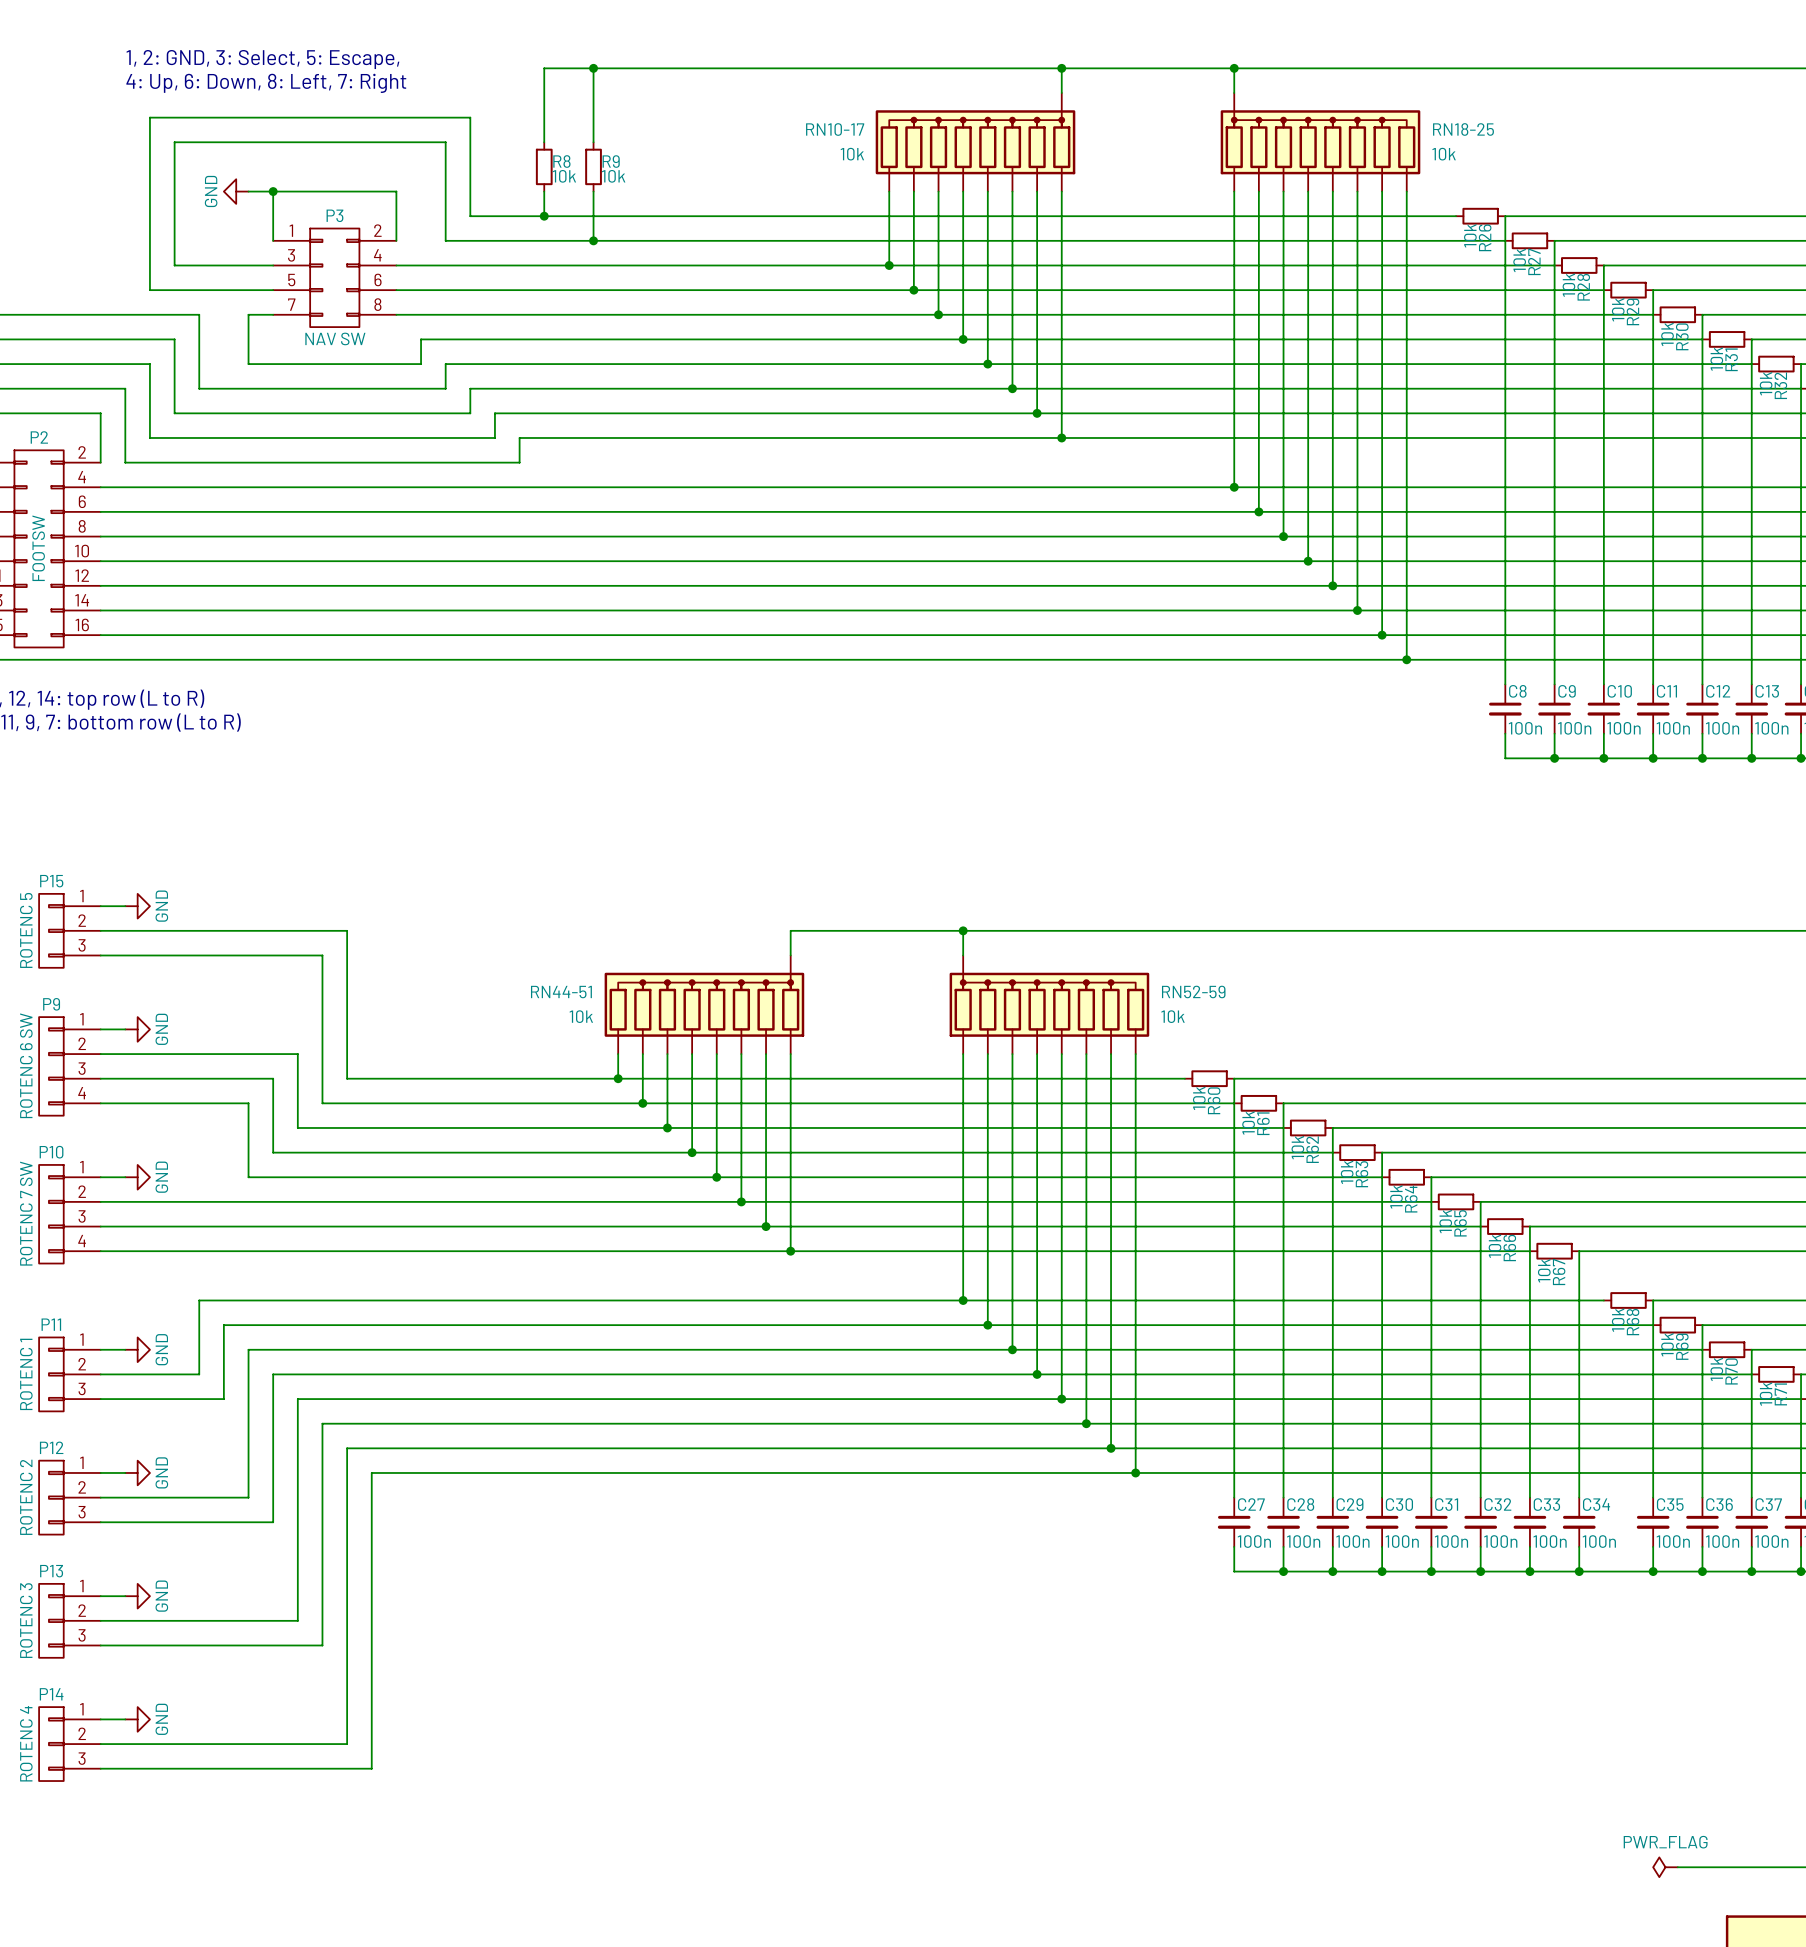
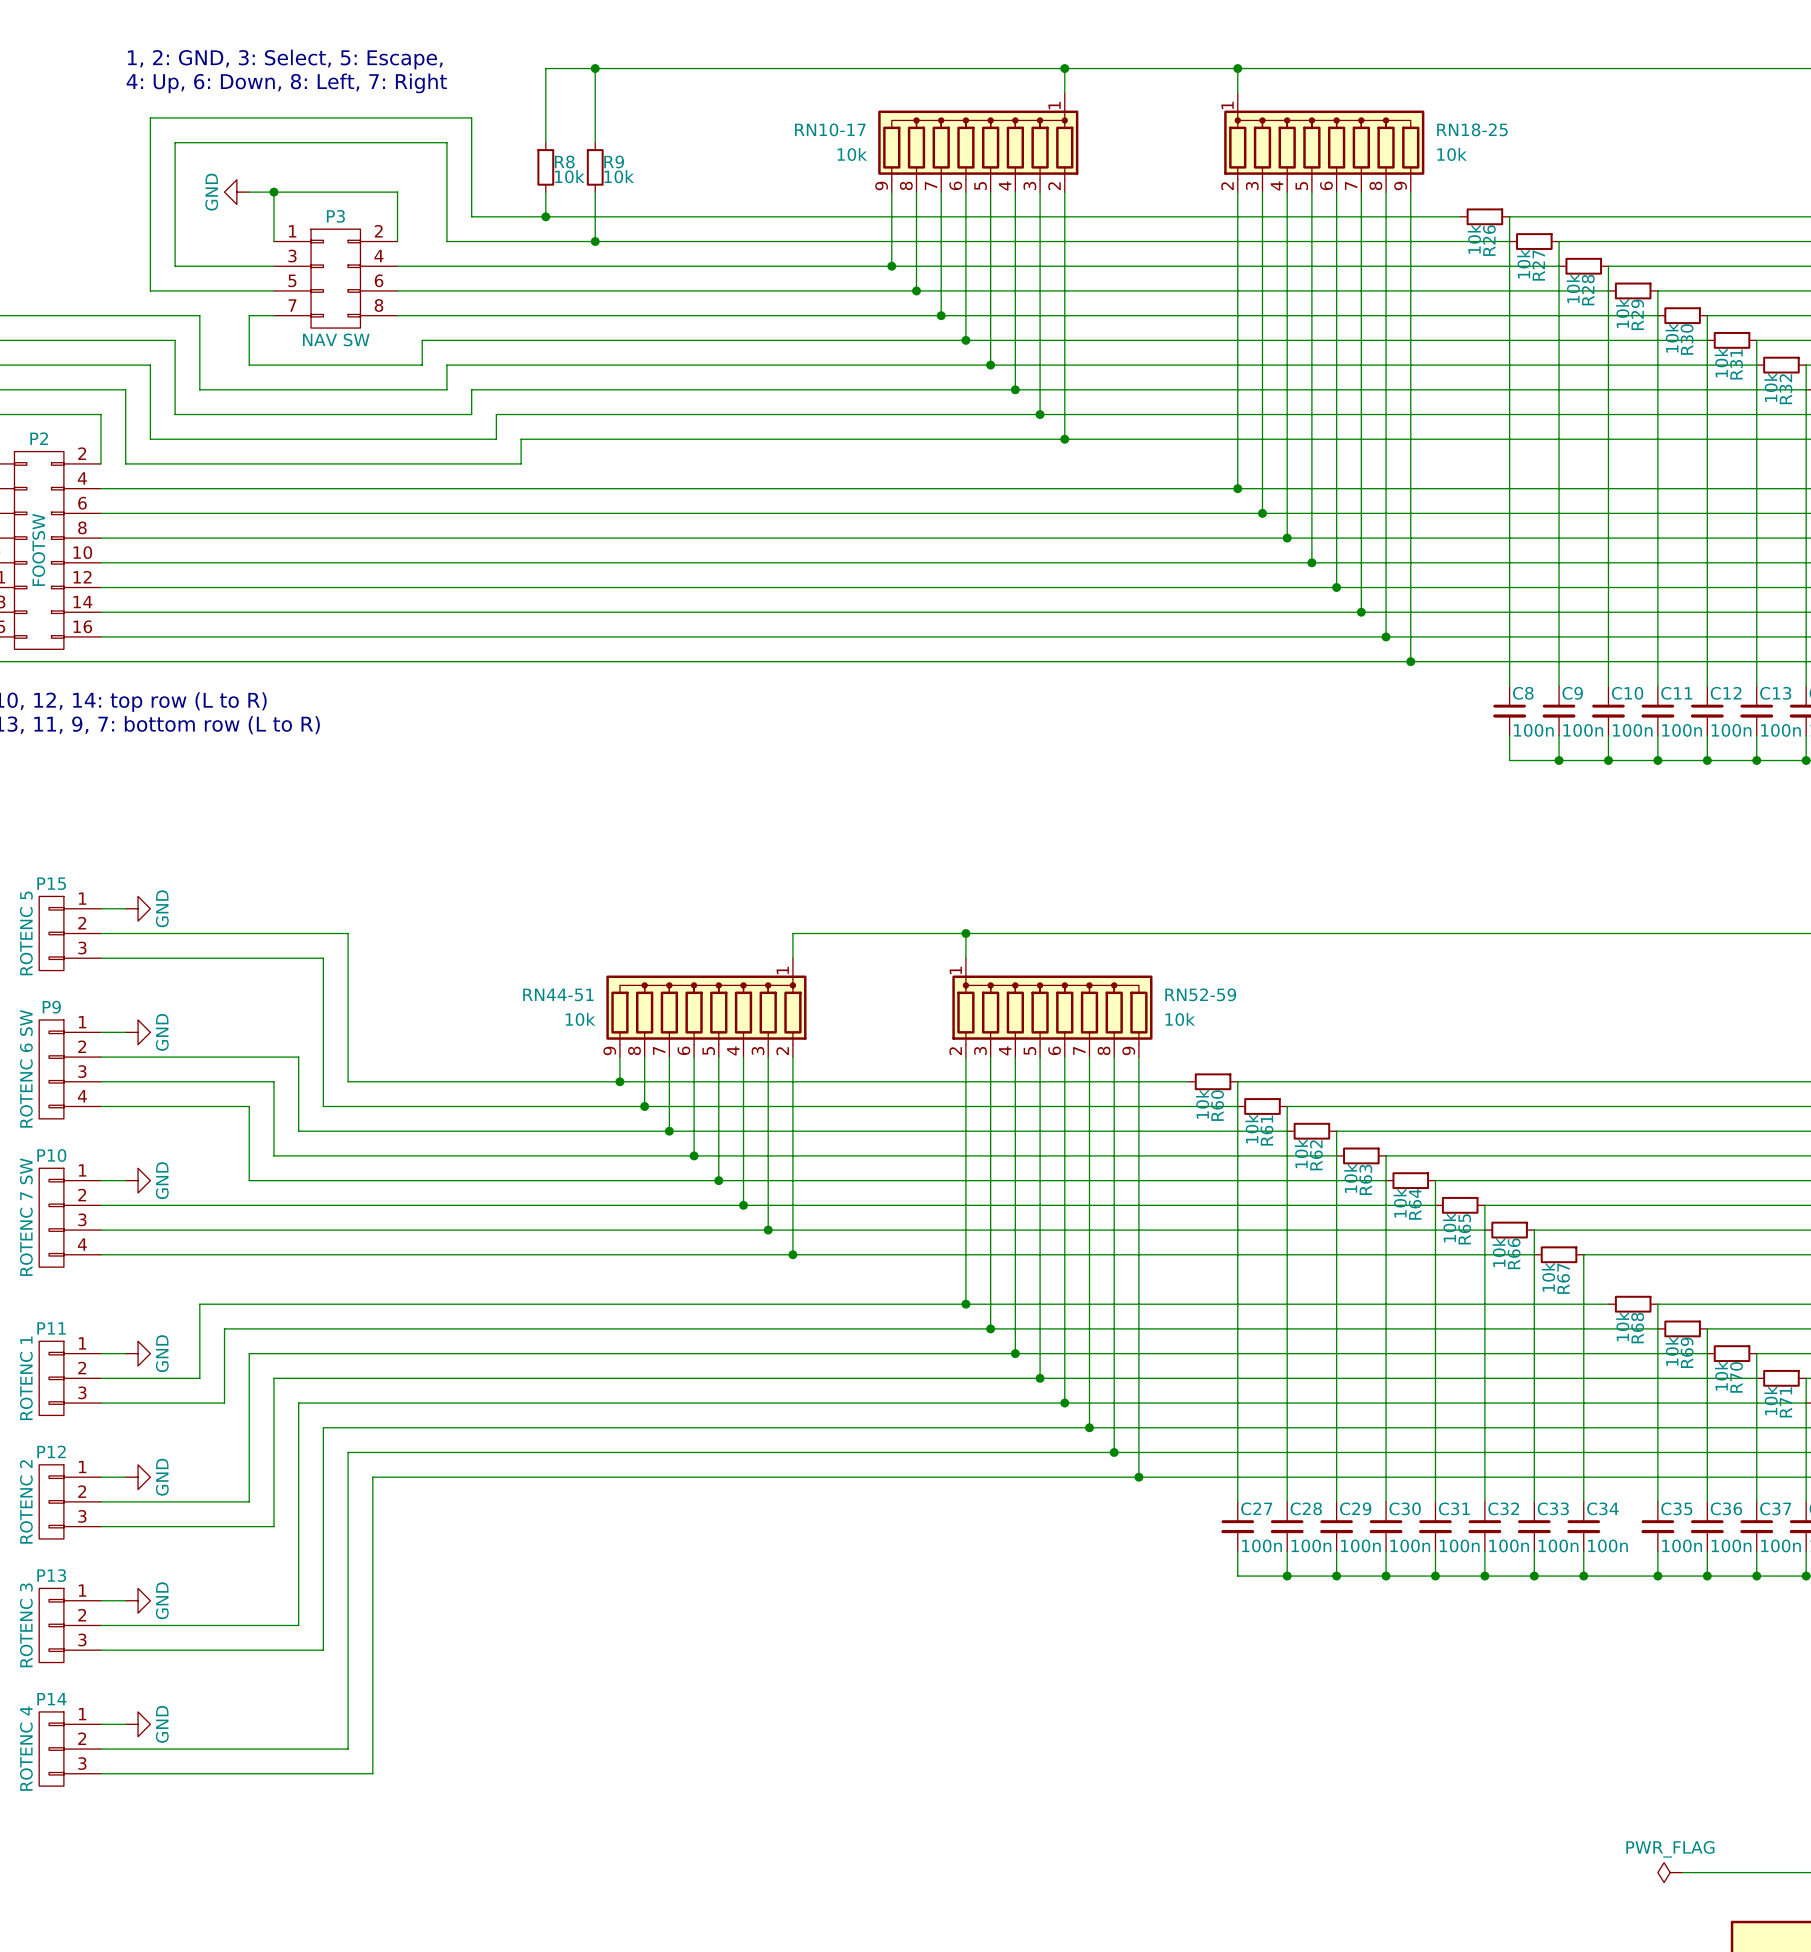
RN10-17 symbol: [875, 92, 1076, 192] -> [878, 93, 1079, 193]
RN18-25 symbol: [1220, 92, 1421, 192] -> [1224, 93, 1425, 193]
RN44-51 symbol: [604, 955, 805, 1055] -> [606, 958, 807, 1058]
RN52-59 symbol: [949, 955, 1150, 1055] -> [952, 958, 1153, 1058]

